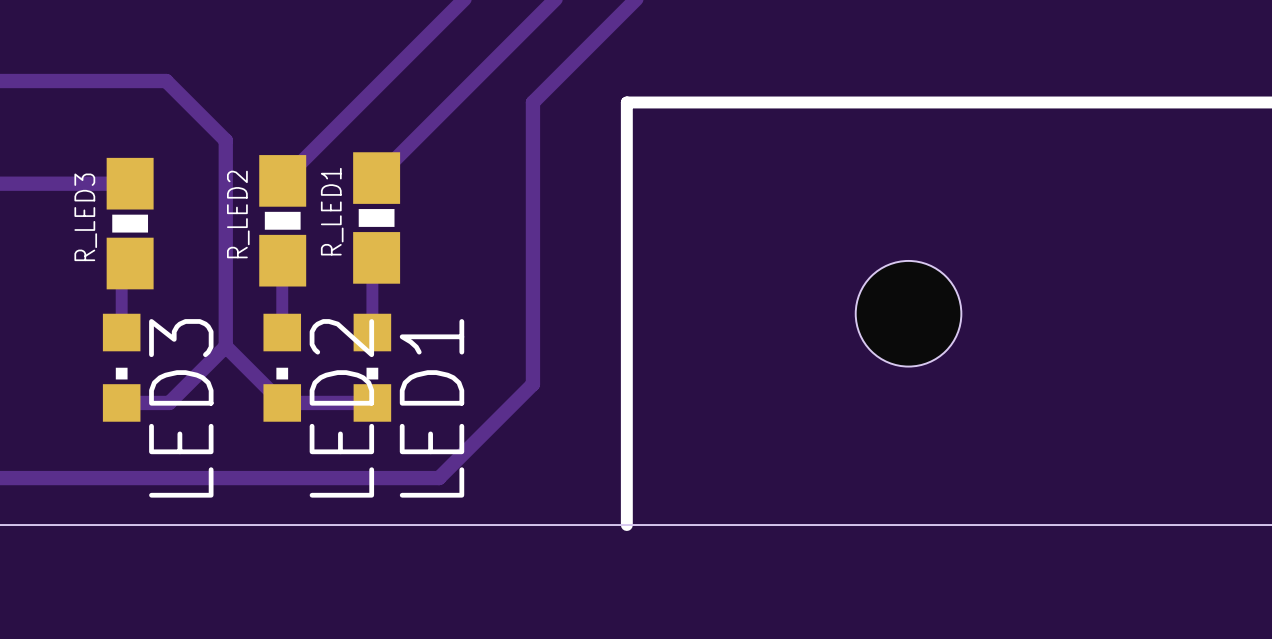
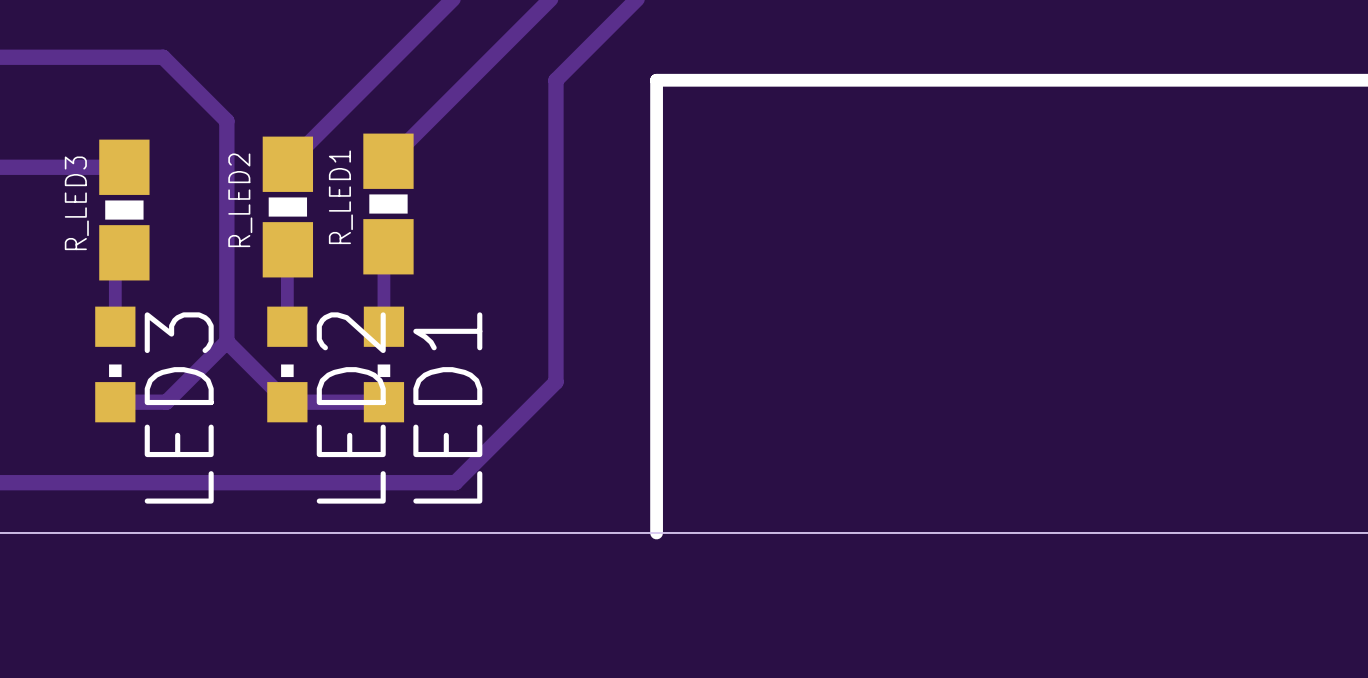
hole: (908, 313) -> none

